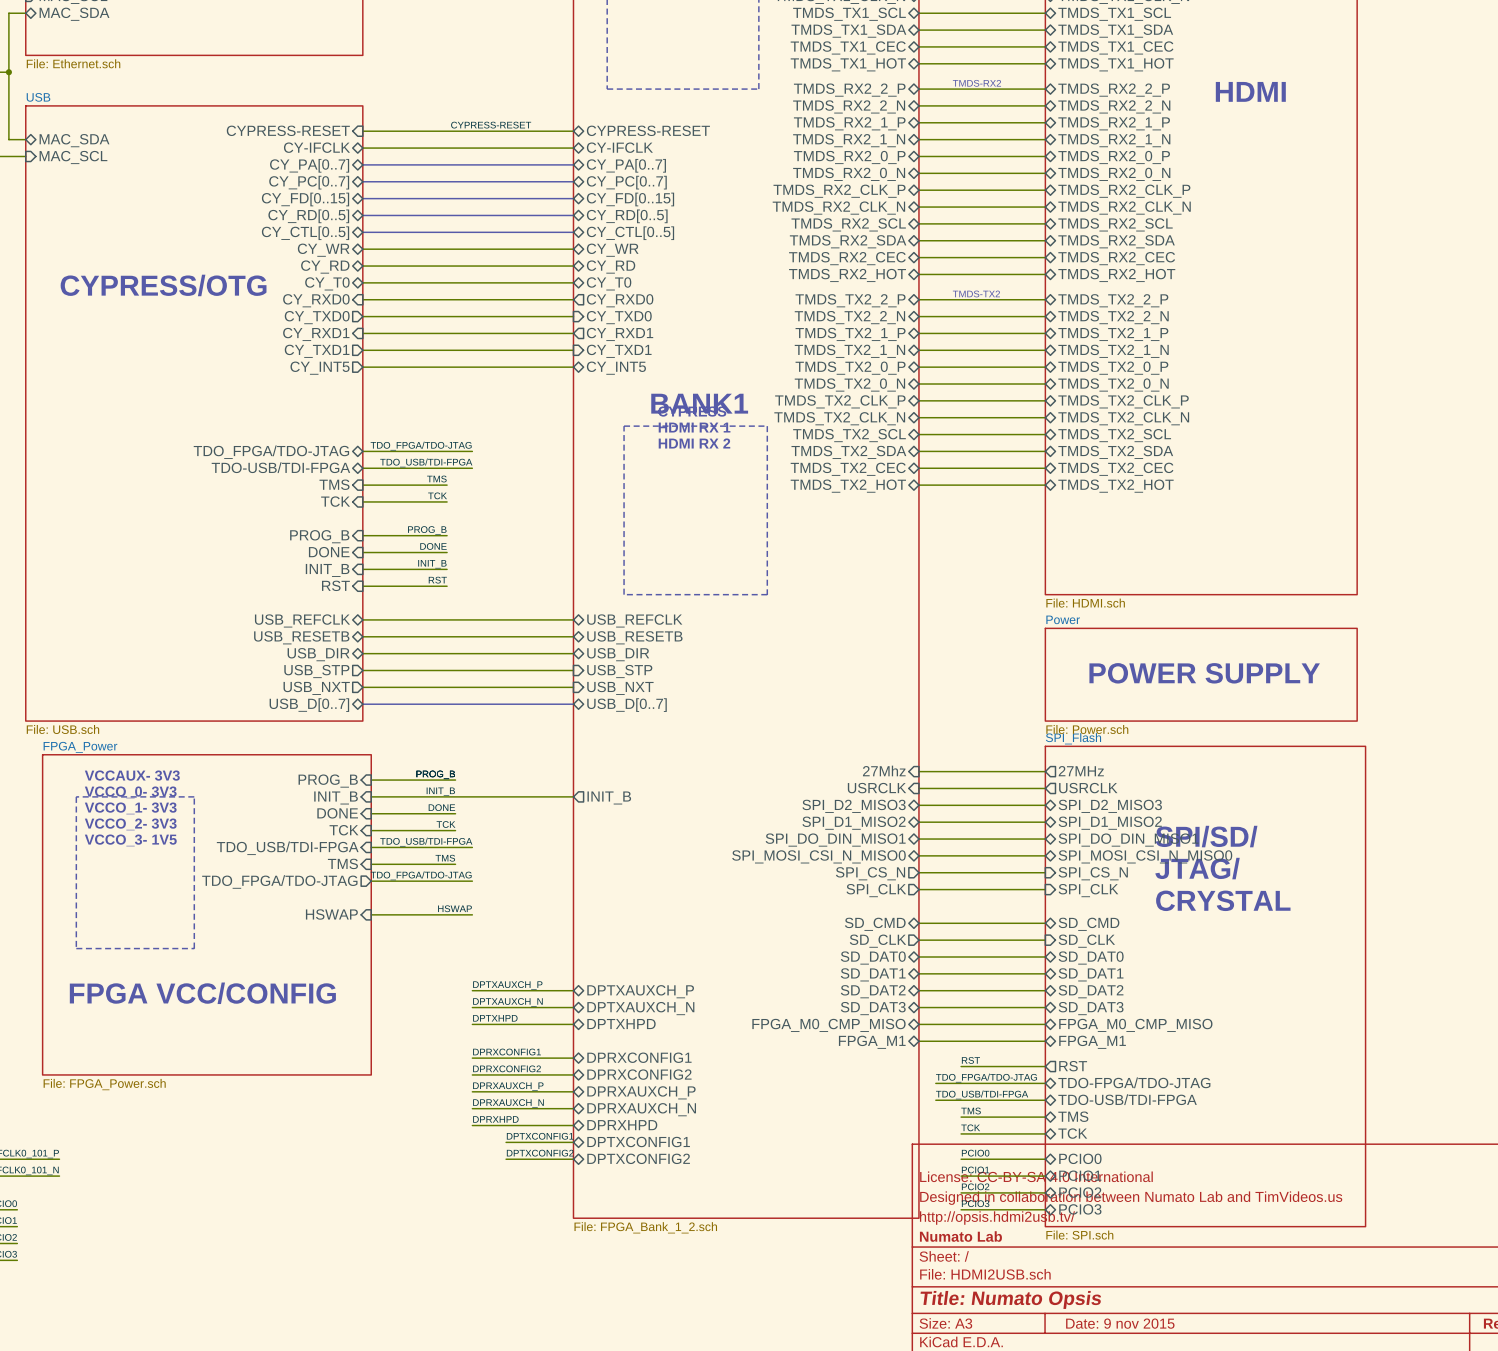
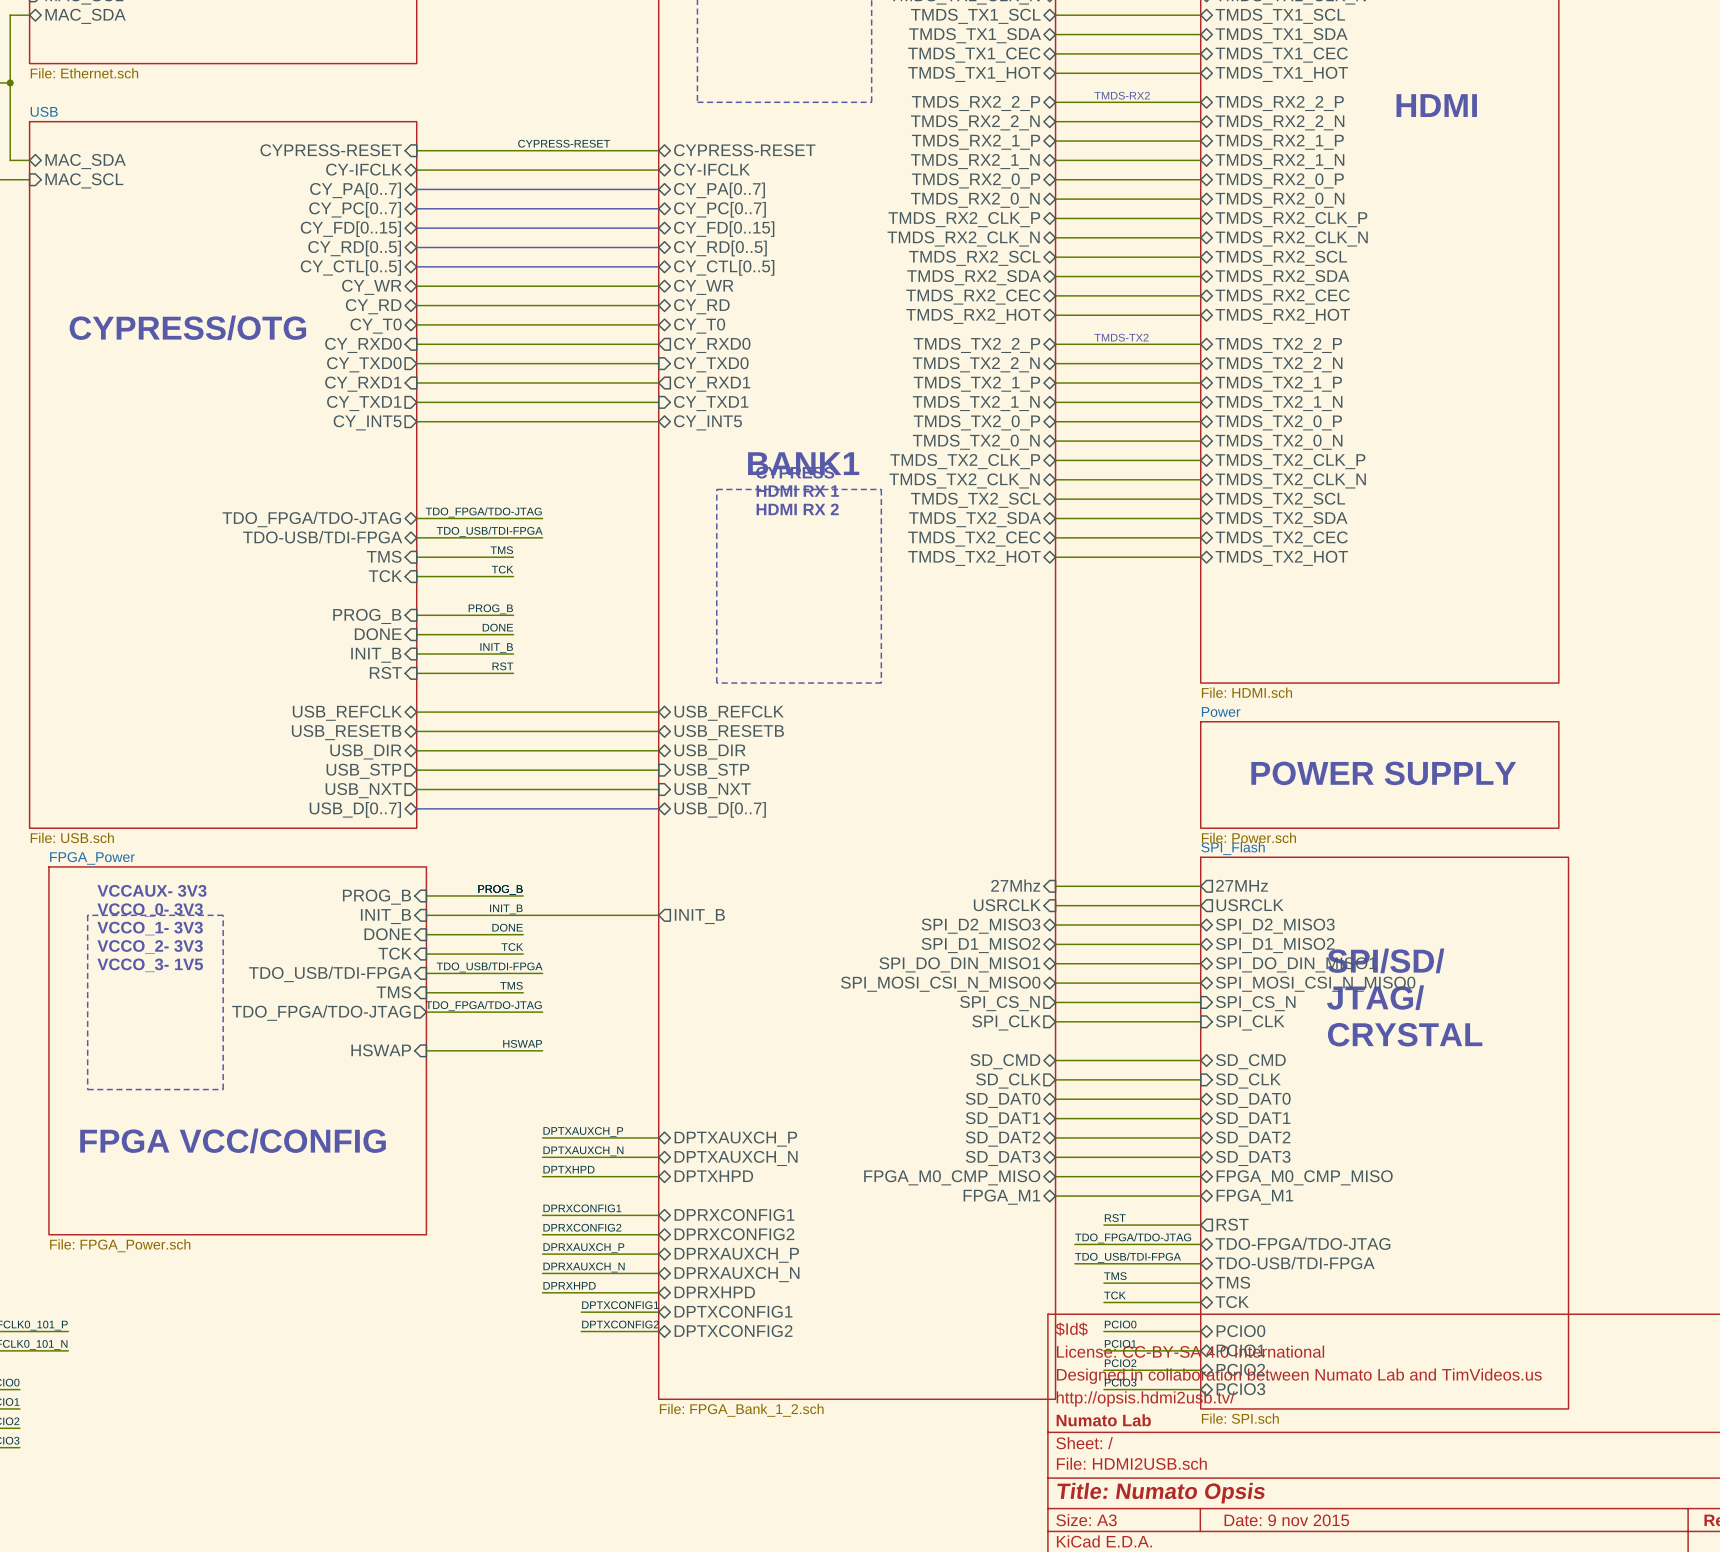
title block: none -> $Id$ (1071, 1329)

